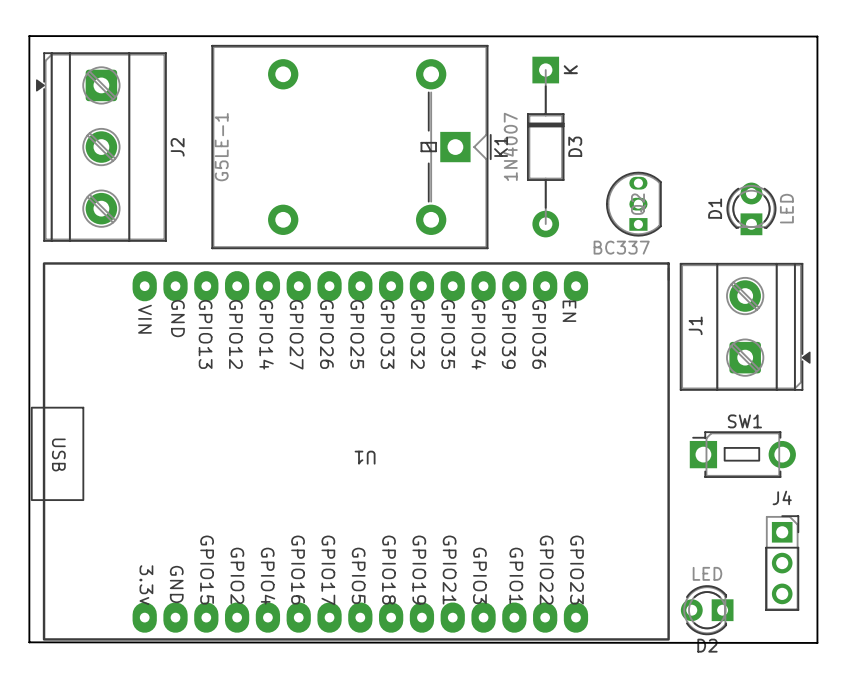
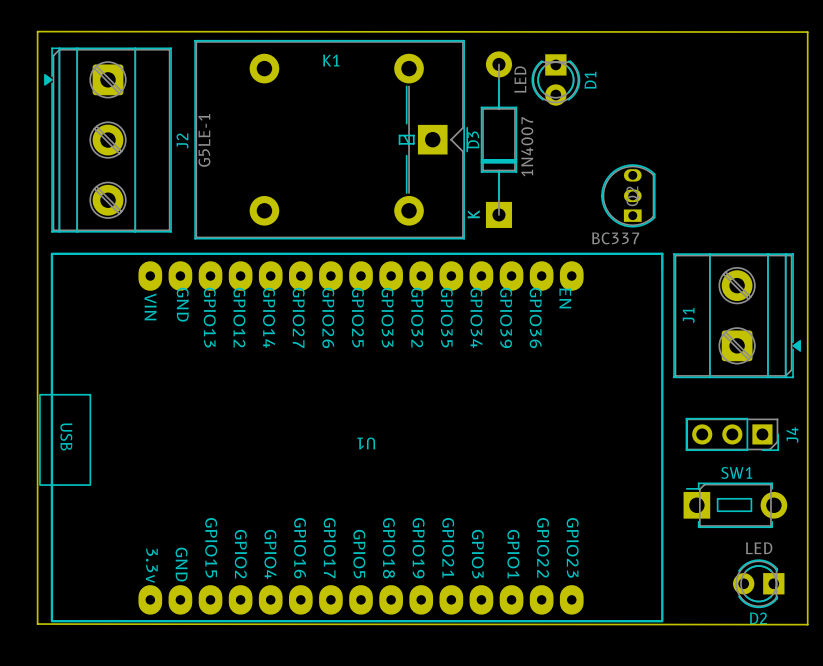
K1 name rotation: 0° (501, 146) -> 90° clockwise (331, 60)
K1 name position: K1 (501, 146) -> K1 (331, 60)
K1 position: (351, 147) -> (331, 139)
D3 rotation: 0° (545, 147) -> 180° (498, 139)
D1 rotation: 0° (751, 208) -> 180° (555, 79)
D1 position: (751, 208) -> (555, 79)
SW1 position: (742, 454) -> (735, 505)
J4 rotation: 0° (782, 563) -> 90° clockwise (732, 434)
J4 position: (782, 563) -> (732, 434)
D2 position: (707, 610) -> (758, 583)

